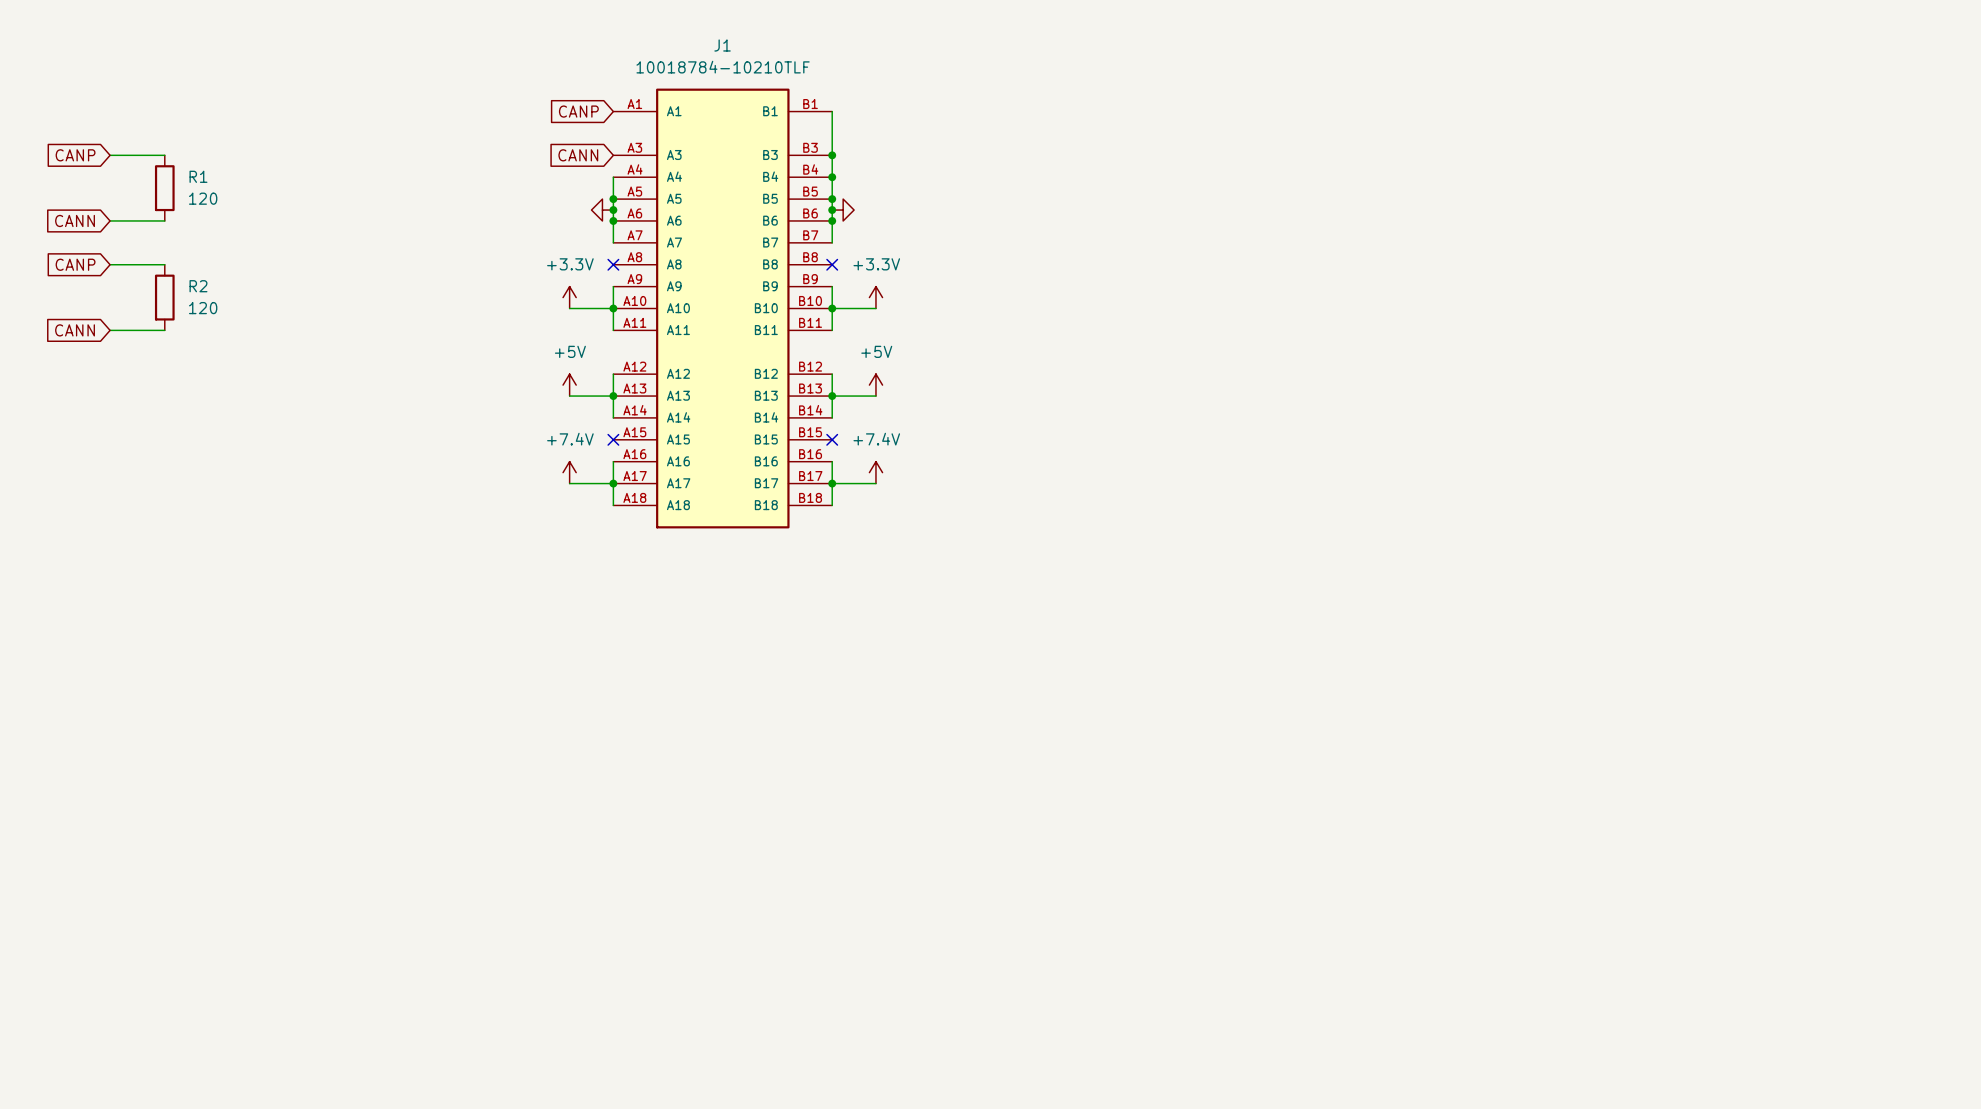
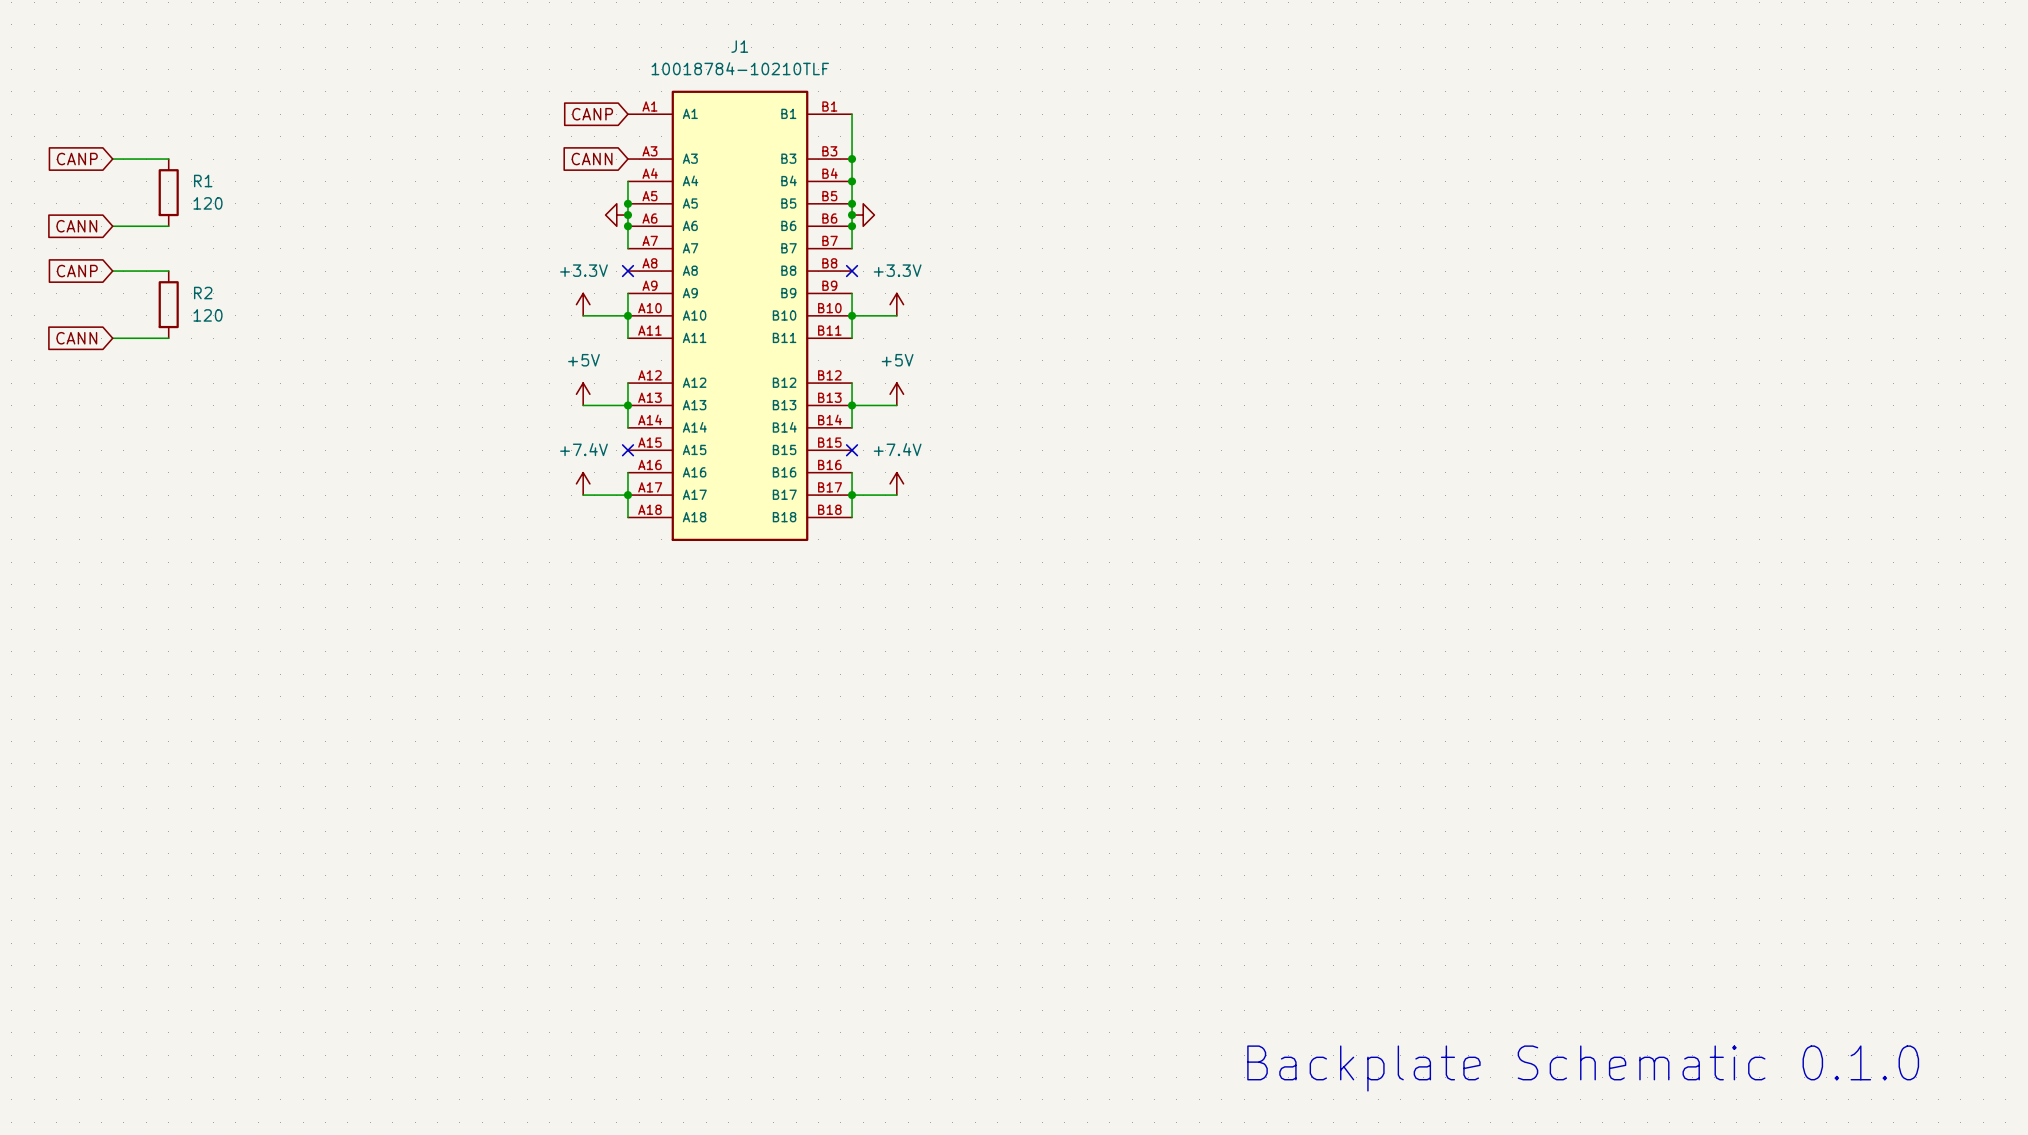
text: none -> Backplate Schematic 0.1.0 (1583, 1068)

